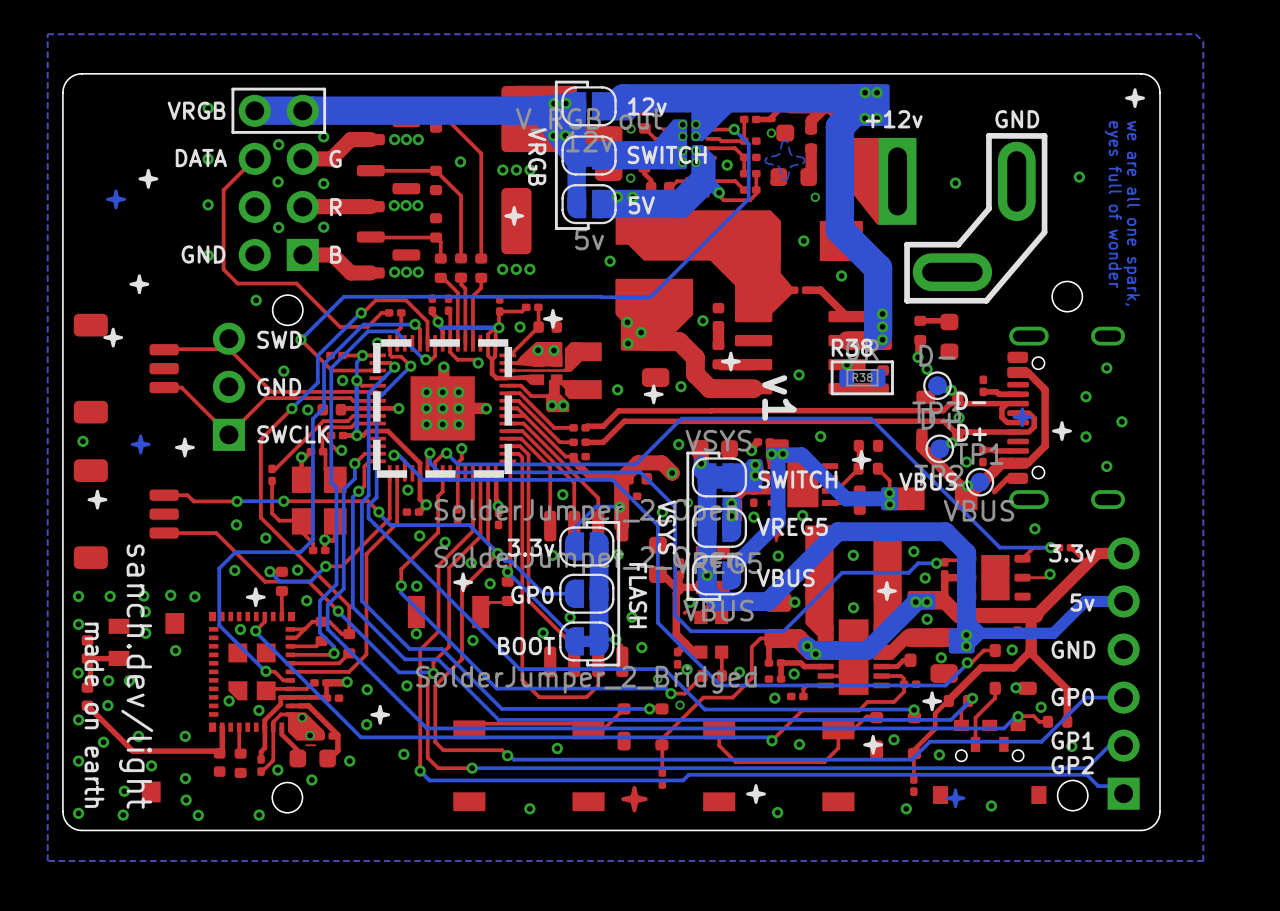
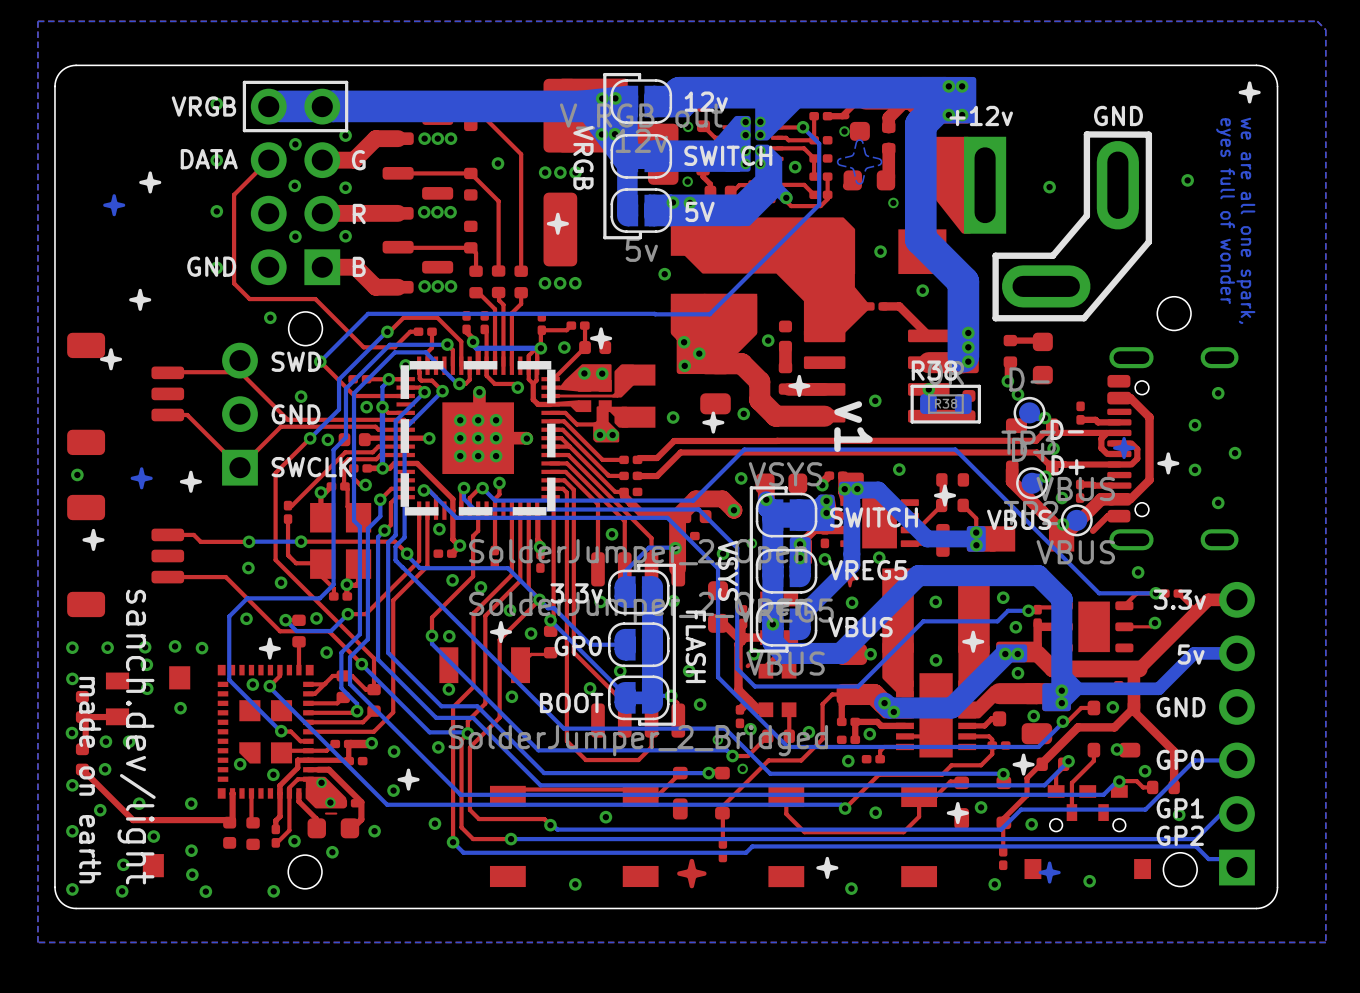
TP1 name: TP1 (978, 454) -> VBUS (1075, 489)

